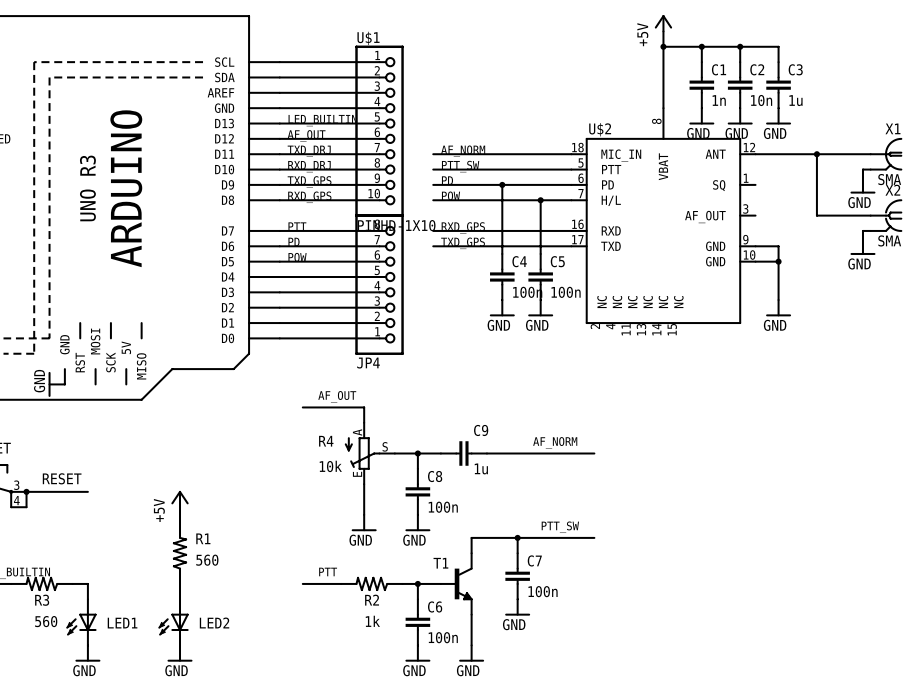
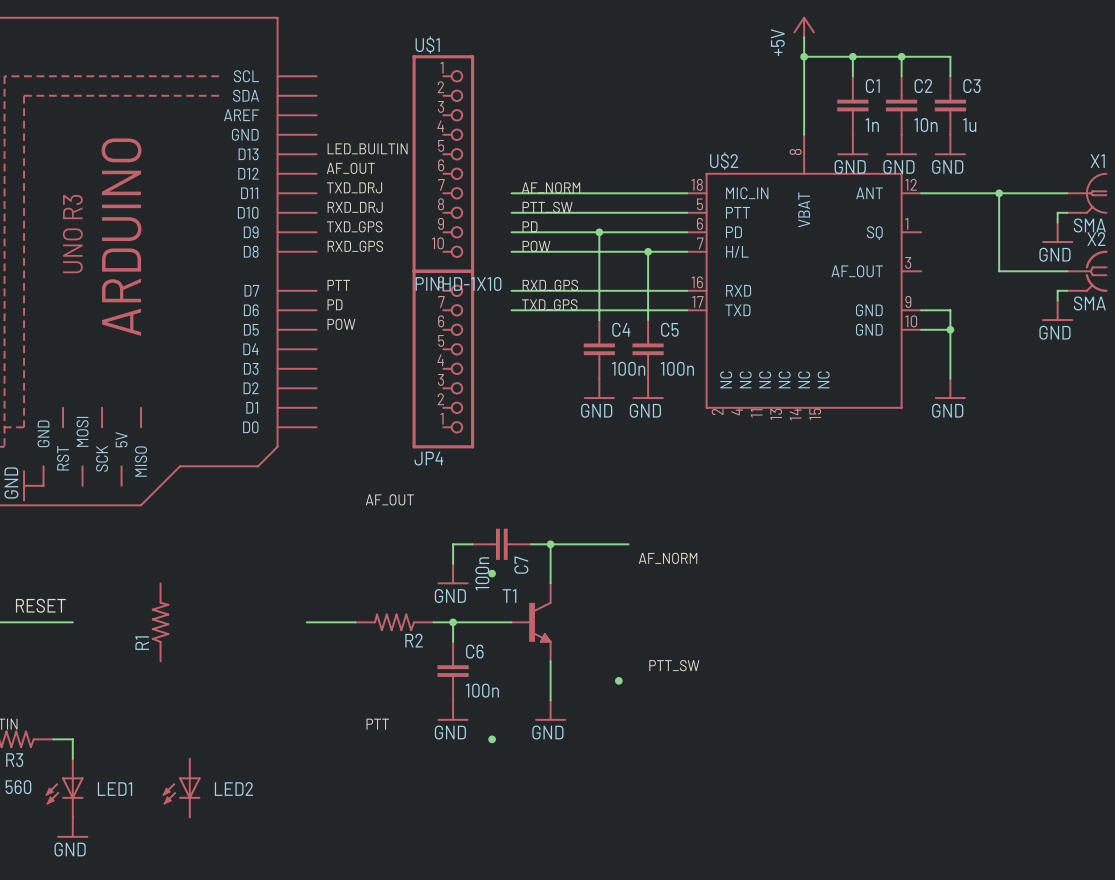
wire: (279, 62) (379, 62) -> none
wire: (279, 77) (379, 77) -> none
wire: (279, 92) (379, 92) -> none
wire: (279, 108) (379, 108) -> none
wire: (279, 123) (379, 123) -> none
wire: (279, 138) (379, 138) -> none
wire: (279, 154) (379, 154) -> none
wire: (279, 169) (379, 169) -> none
wire: (279, 184) (379, 184) -> none
wire: (279, 200) (379, 200) -> none
wire: (279, 230) (379, 230) -> none
wire: (279, 246) (379, 246) -> none
wire: (279, 261) (379, 261) -> none
wire: (279, 277) (379, 277) -> none
wire: (279, 292) (379, 292) -> none
wire: (279, 307) (379, 307) -> none
wire: (279, 323) (379, 323) -> none
wire: (279, 338) (379, 338) -> none
wire: (302, 407) (364, 407) (364, 422) -> none
wire: none -> (472, 544) (453, 544) (453, 563)
wire: none -> (531, 544) (628, 544)
junction: none -> (550, 544)
R4: 10k (370, 453) -> none
power symbol: none -> GND (453, 574)
wire: (394, 453) (440, 453) -> none
wire: (417, 453) (417, 468) -> none
C9: 1u (463, 453) -> none
wire: (486, 453) (594, 453) -> none
wire: (364, 484) (364, 514) -> (550, 544) (550, 583)
wire: none -> (433, 622) (511, 622)
junction: none -> (453, 622)
C8: 100n (417, 491) -> none
power symbol: +5V (180, 499) -> none
wire: (180, 507) (180, 522) -> none
power symbol: GND (364, 522) -> none
power symbol: GND (417, 522) -> none
wire: (517, 537) (517, 553) -> none
wire: (594, 537) (471, 537) (471, 553) -> none
R1 name rotation: 0° (203, 538) -> 90° counterclockwise (142, 643)
R1 name position: R1 (203, 538) -> R1 (142, 643)
R1 position: (180, 553) -> (160, 622)
R1 value: 560 (207, 560) -> none
power symbol: none -> GND (453, 710)
power symbol: none -> GND (550, 710)
C7 rotation: 0° (517, 576) -> 90° clockwise (501, 544)
C7 position: (517, 576) -> (501, 544)
wire: (180, 583) (180, 599) -> none
wire: (302, 583) (341, 583) -> (306, 622) (355, 622)
R2 position: (371, 583) -> (394, 622)
wire: (402, 583) (440, 583) -> none
wire: (417, 583) (417, 599) -> (453, 622) (453, 641)
T1 position: (456, 583) -> (531, 622)
R2 name position: R2 (372, 600) -> R2 (414, 640)
power symbol: GND (517, 607) -> none
wire: (471, 614) (471, 645) -> (550, 661) (550, 700)
R2 value: 1k (372, 621) -> none
C6 position: (417, 622) -> (453, 671)
power symbol: GND (180, 653) -> none
power symbol: GND (417, 653) -> none
power symbol: GND (471, 653) -> none

